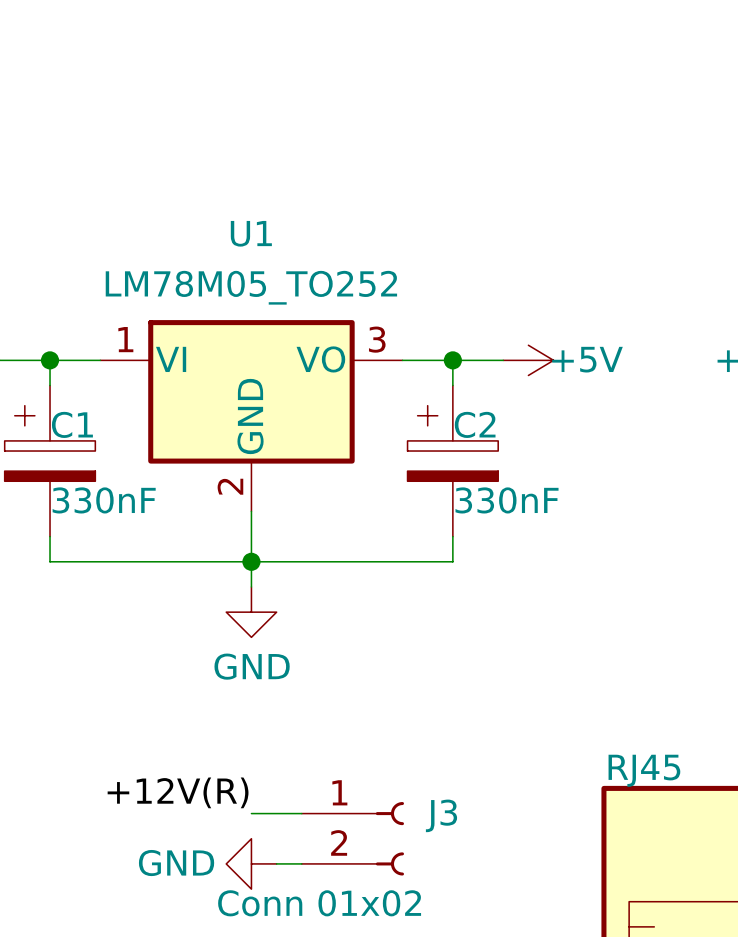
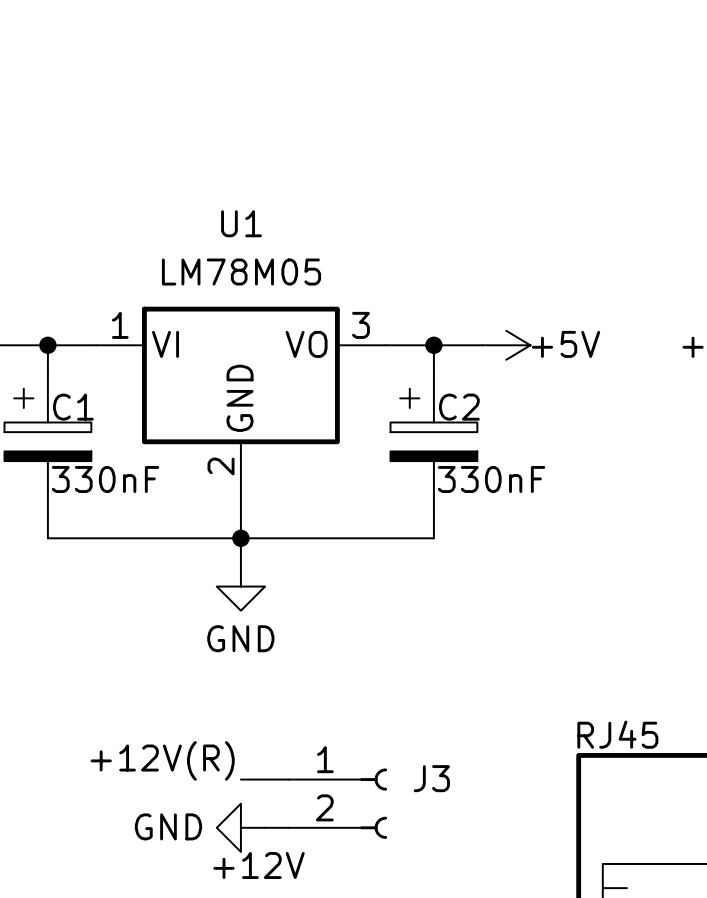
U1 value: LM78M05_TO252 (251, 287) -> LM78M05 (241, 272)
J3 value: Conn 01x02 (319, 903) -> +12V (259, 865)

